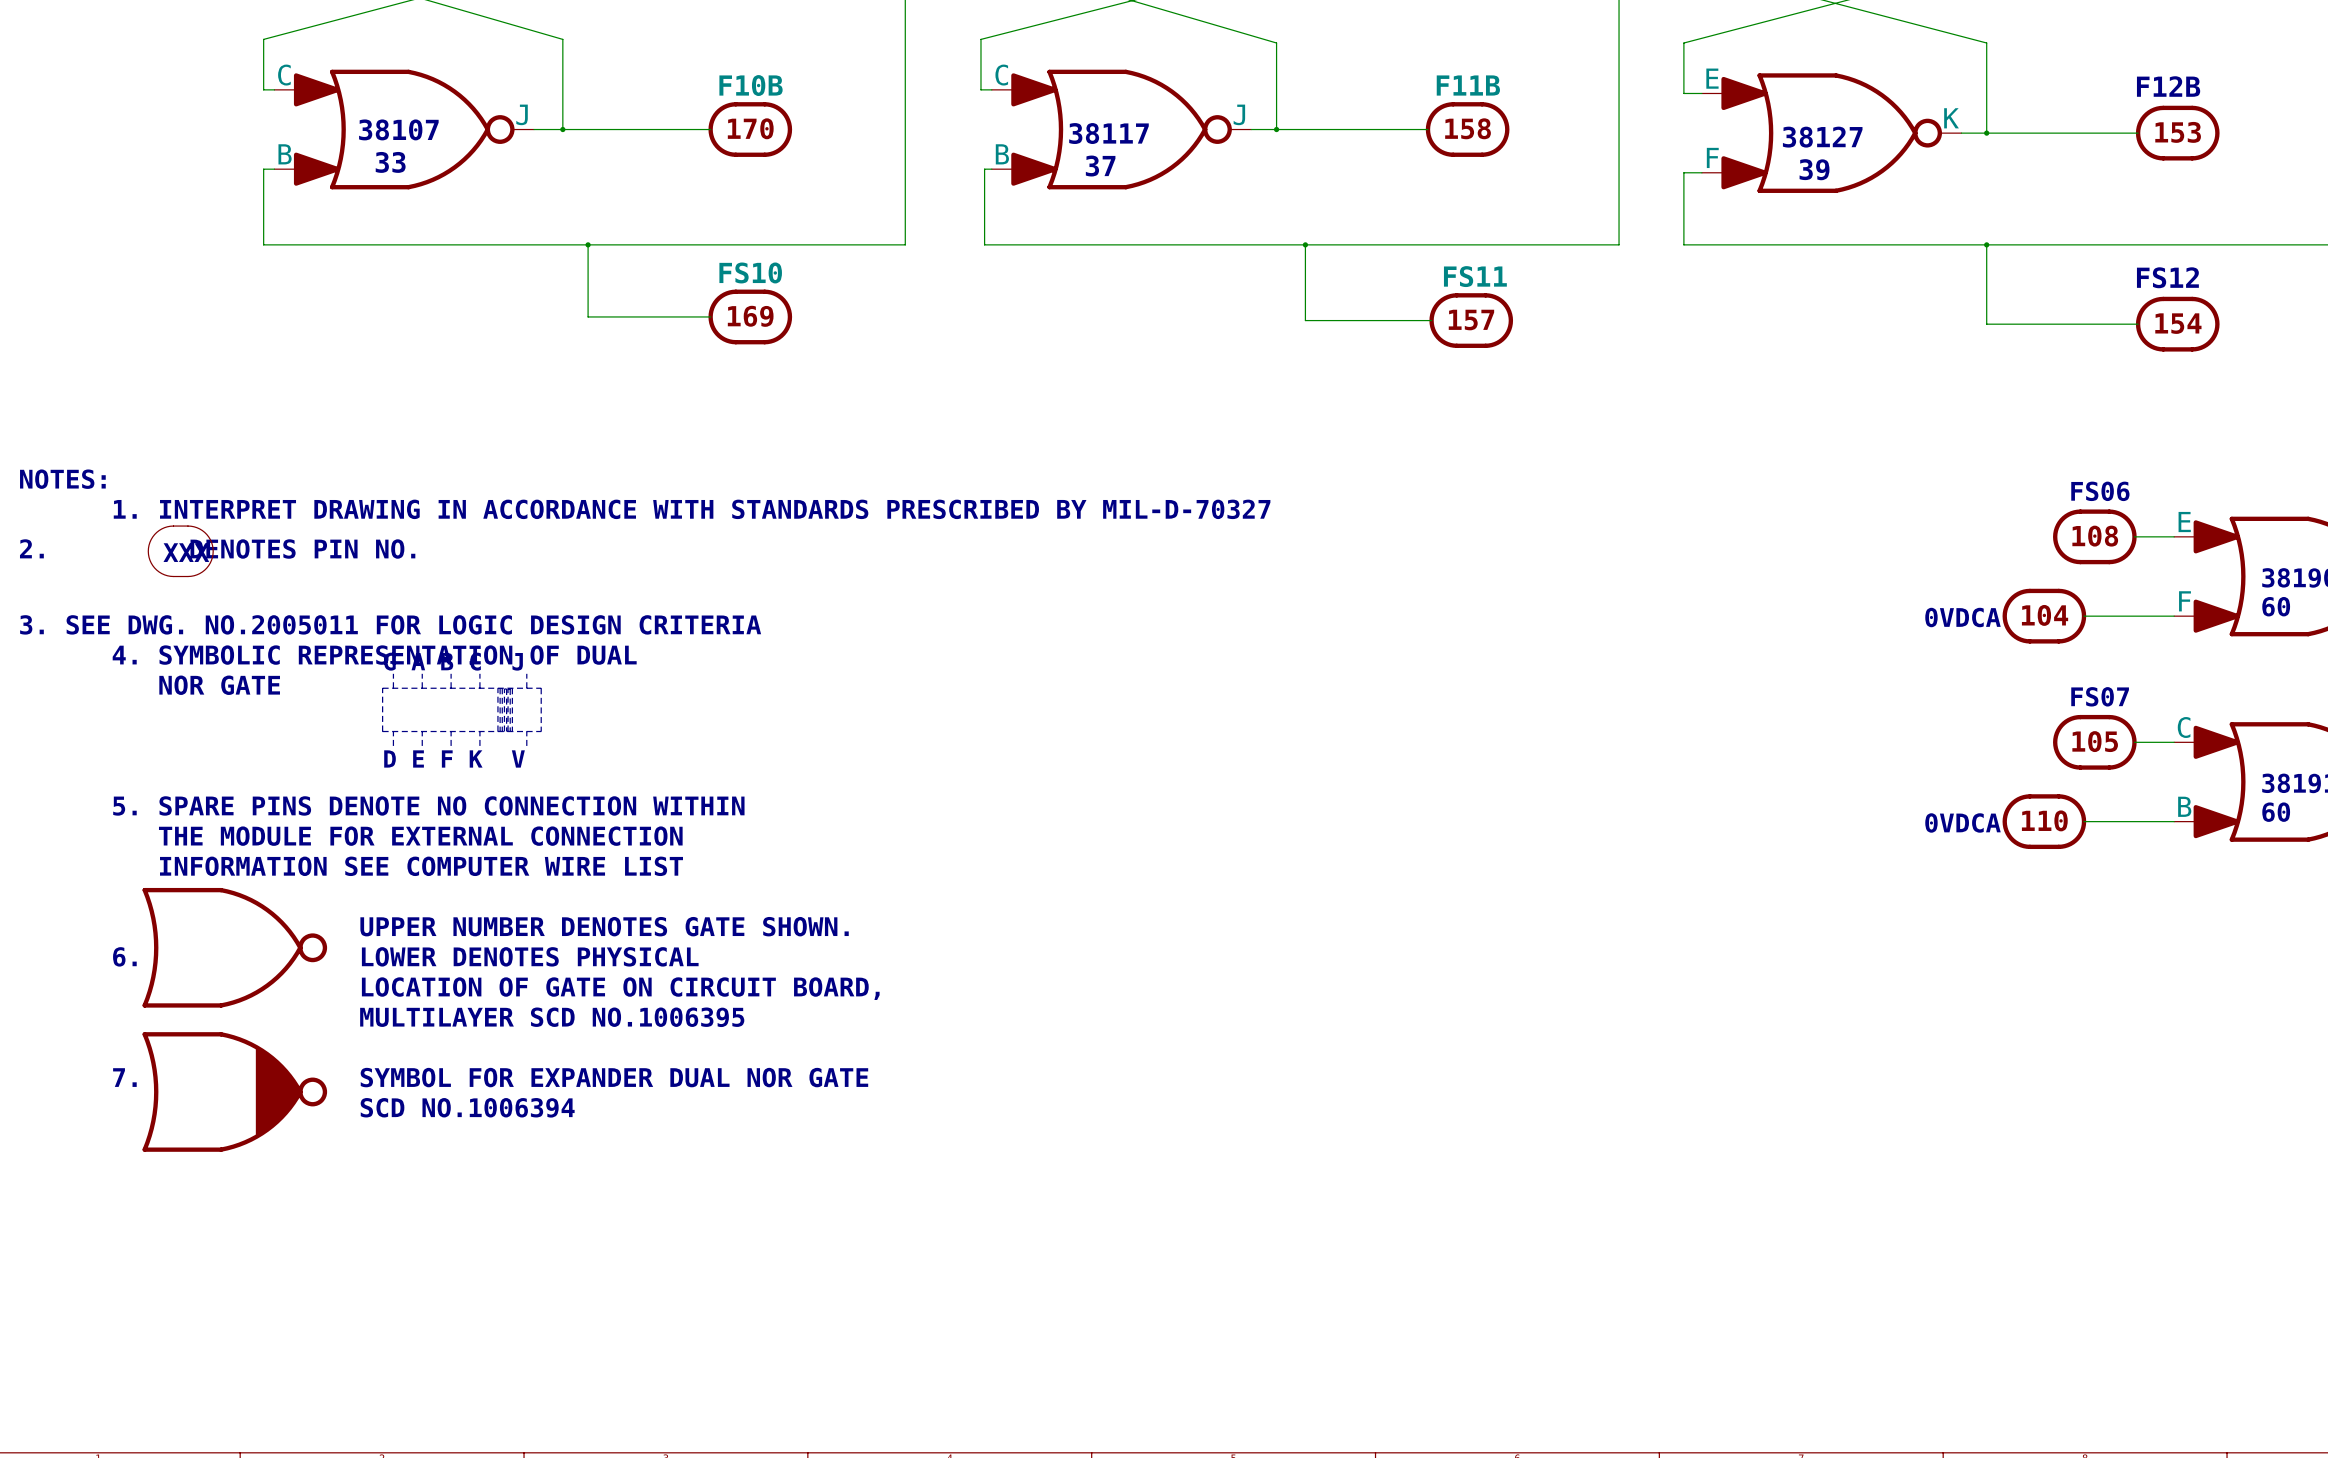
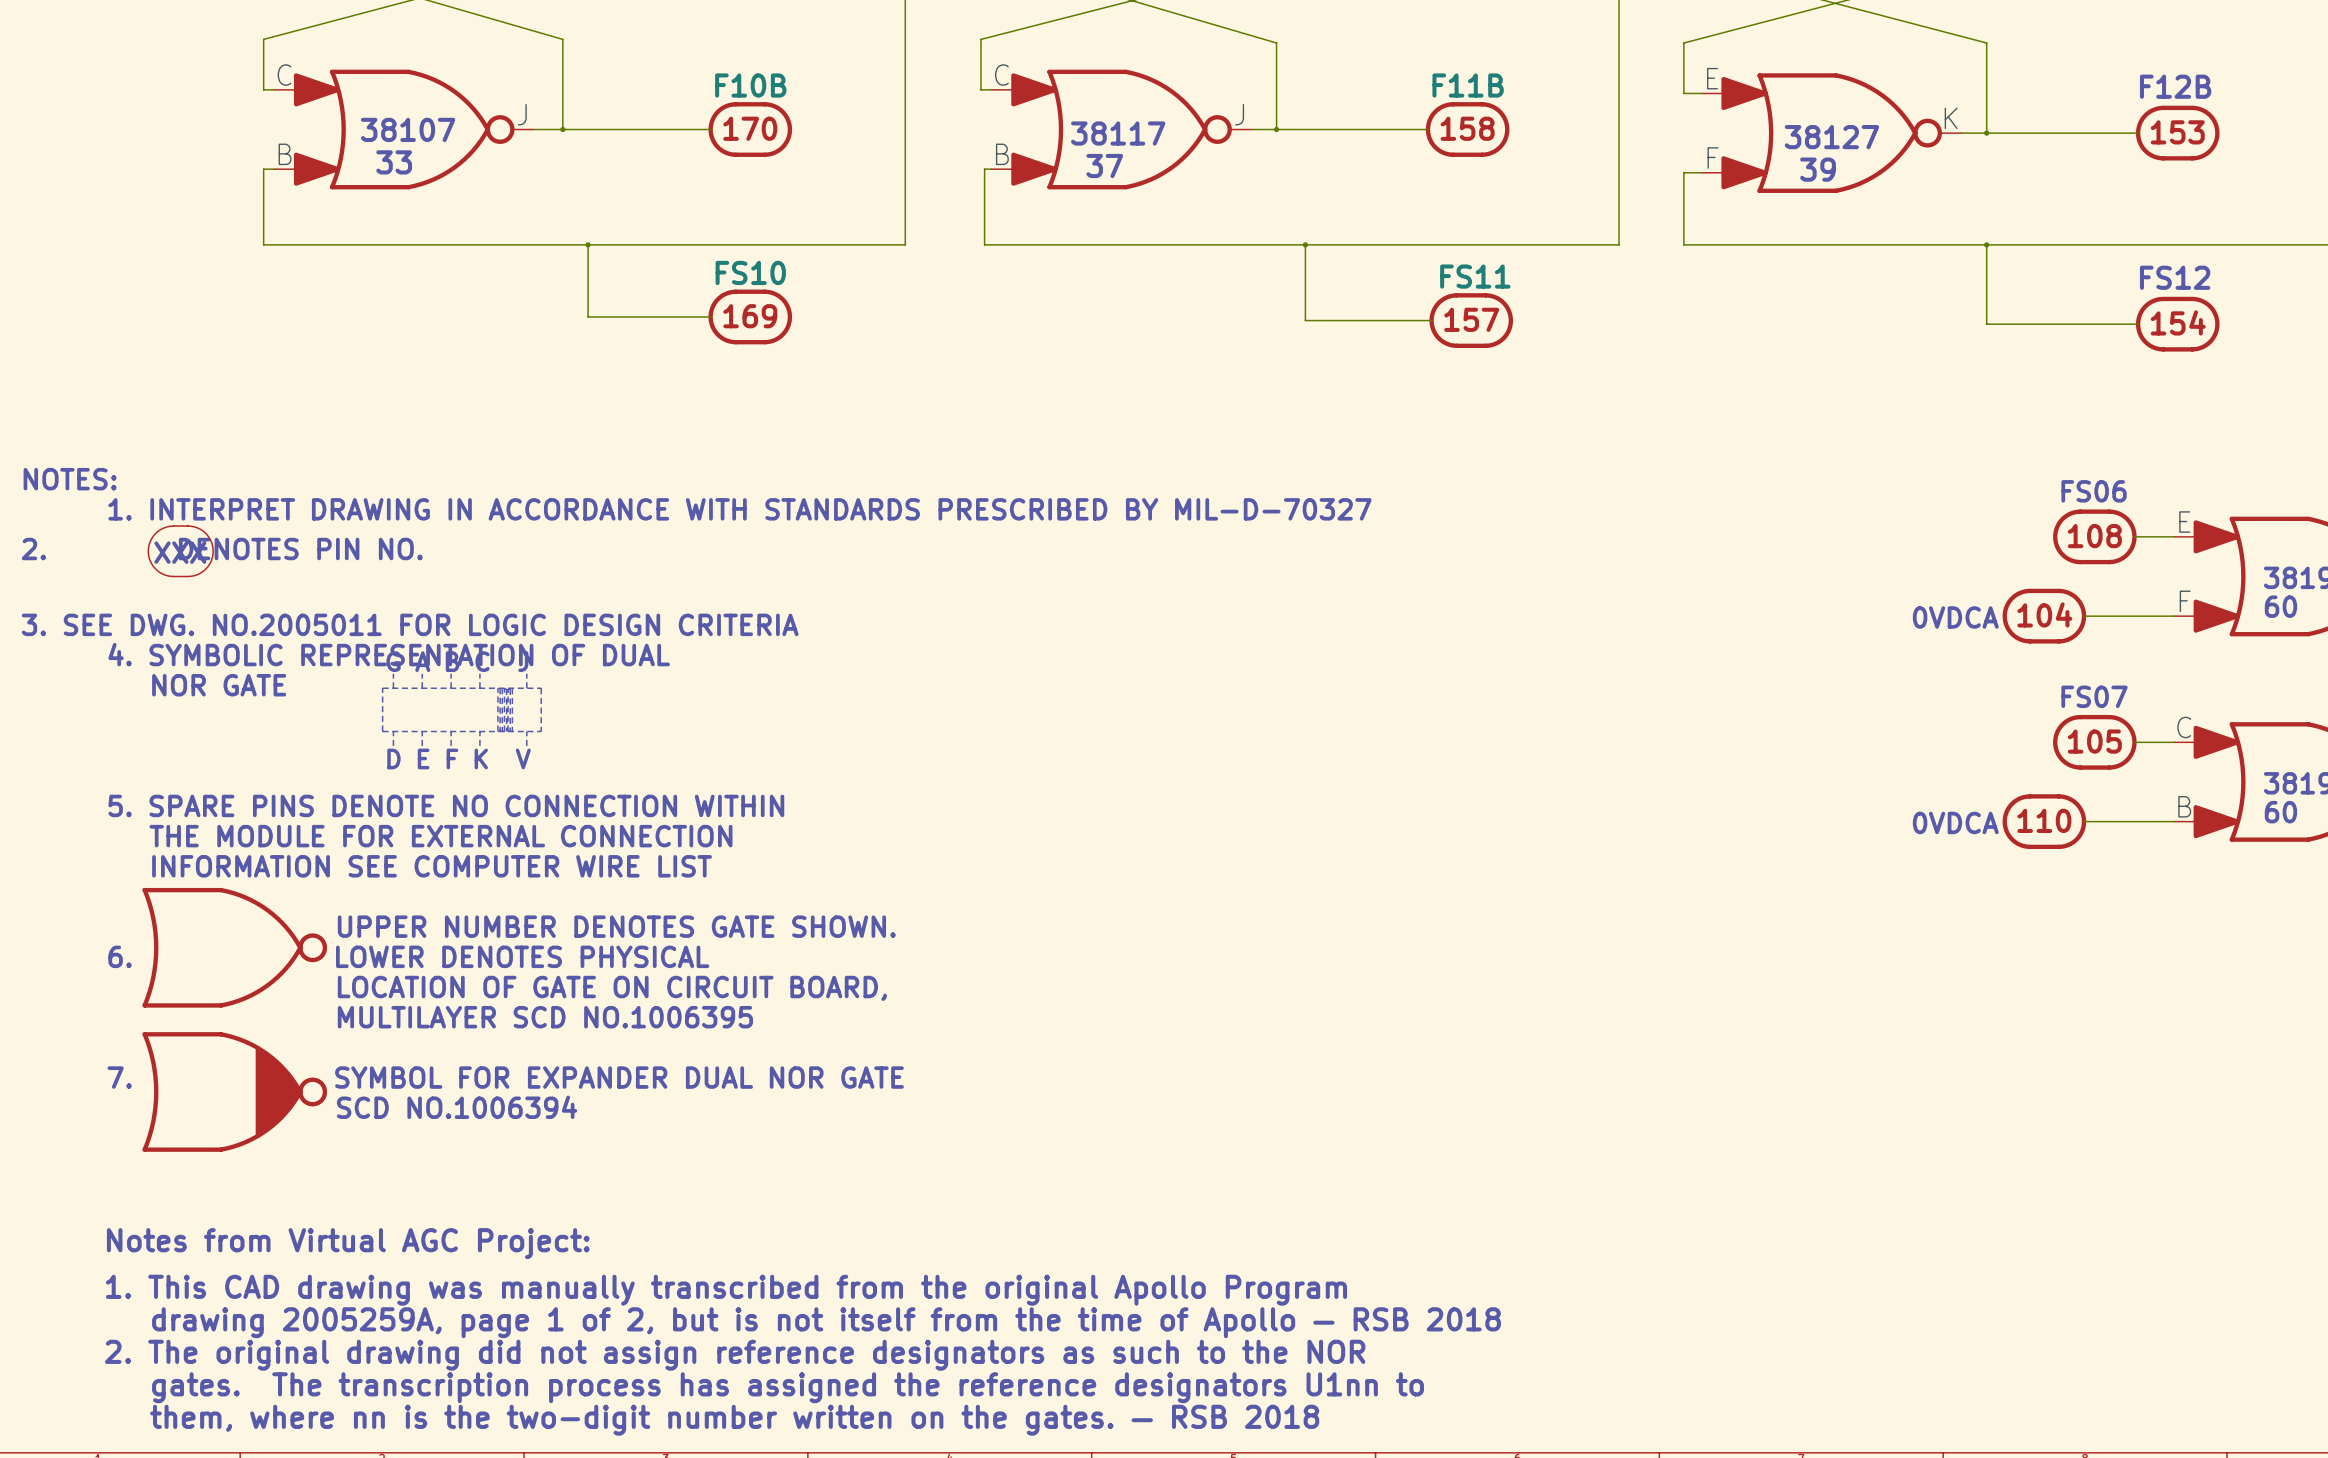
text: none -> Notes from Virtual AGC Project: (348, 1243)
text: none -> 1. This CAD drawing was manually transcribed from the original Apollo Program (726, 1290)
text: none -> drawing 2005259A, page 1 of 2, but is not itself from the time of Apollo — RSB 2018 (826, 1322)
text: none -> 2. The original drawing did not assign reference designators as such to the NOR (735, 1355)
text: none -> gates. The transcription process has assigned the reference designators U1nn to (788, 1387)
text: none -> them, where nn is the two-digit number written on the gates. — RSB 2018 (734, 1420)

